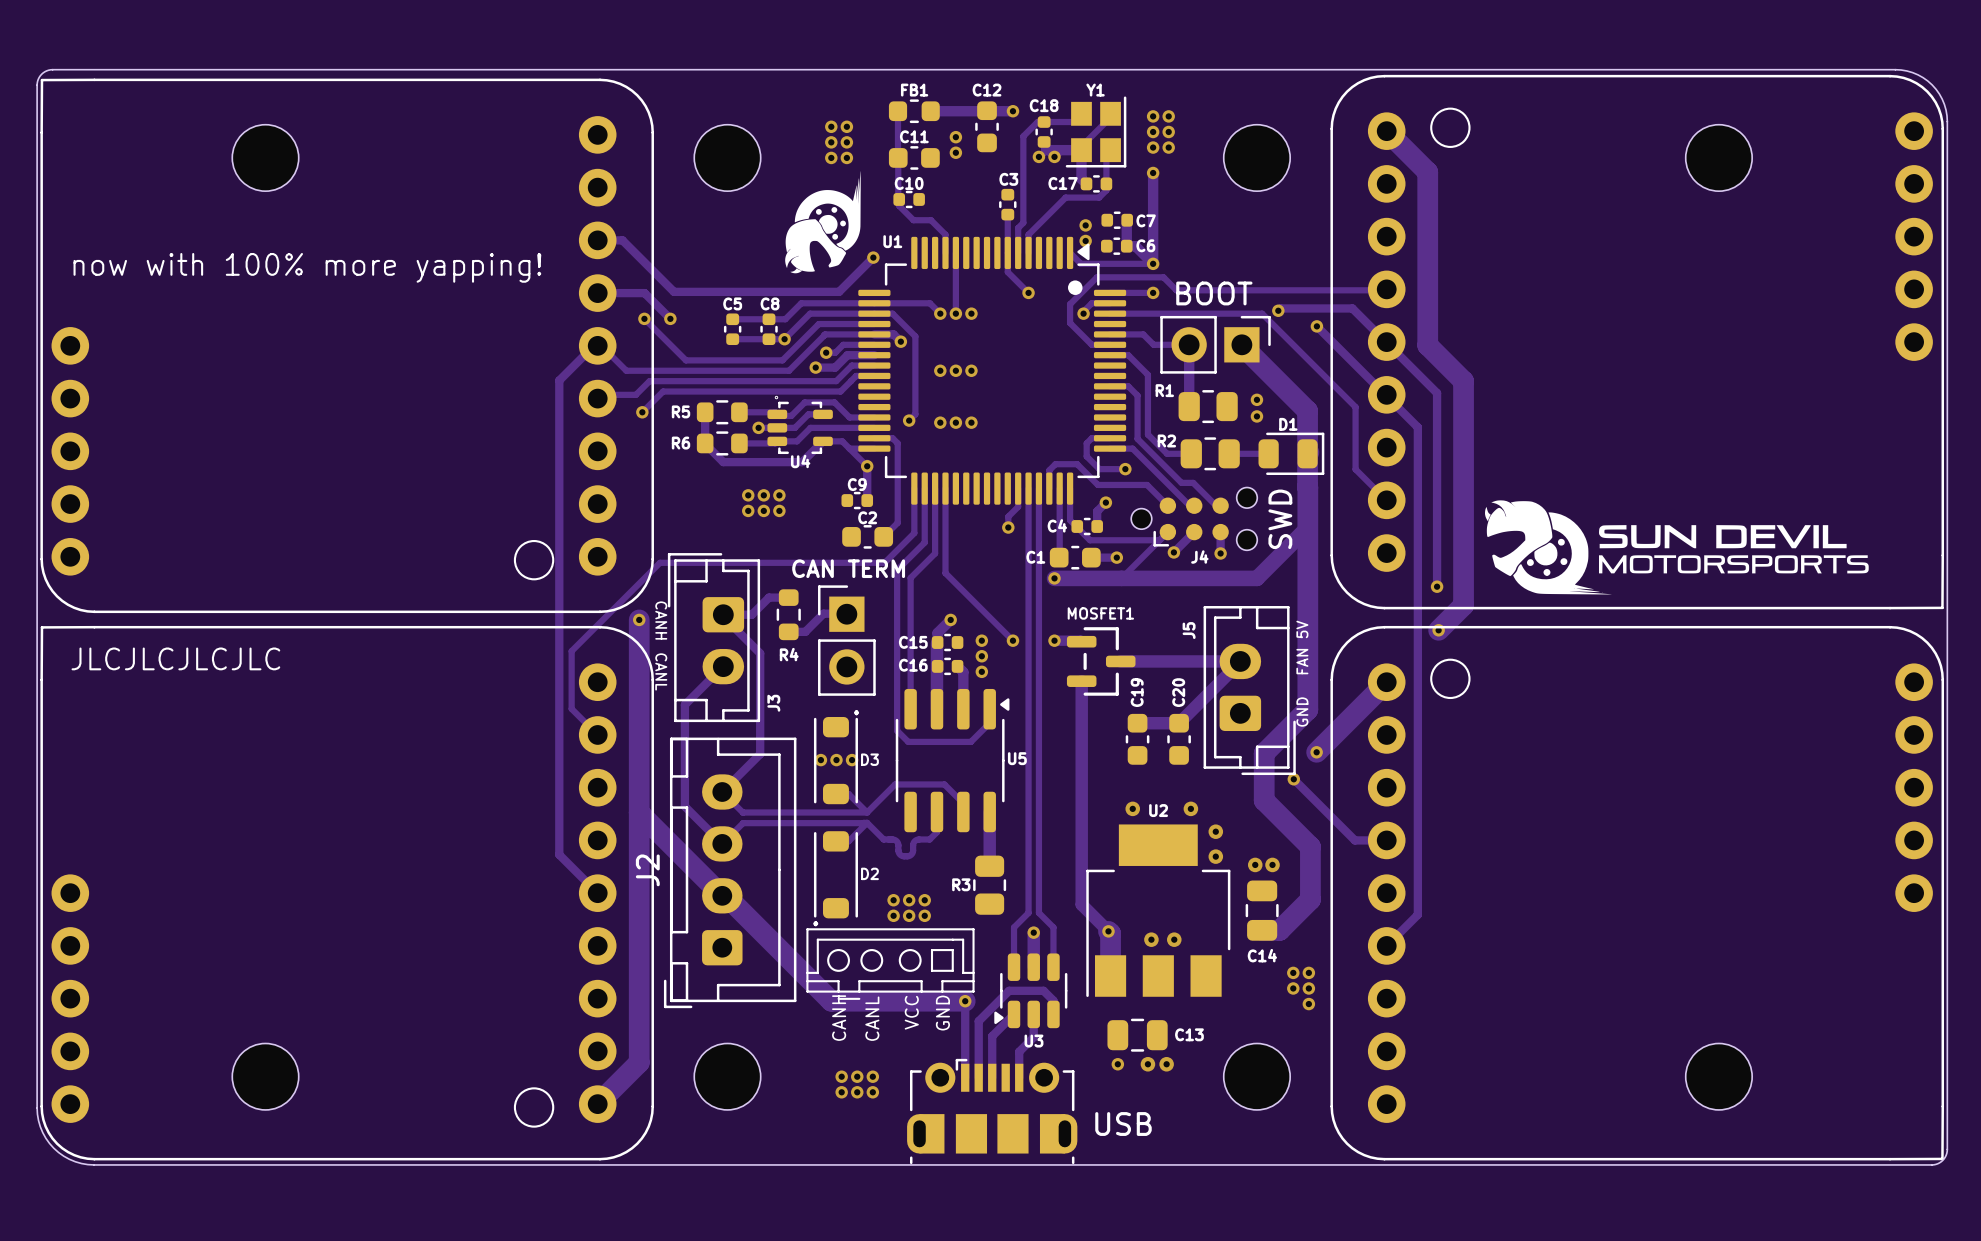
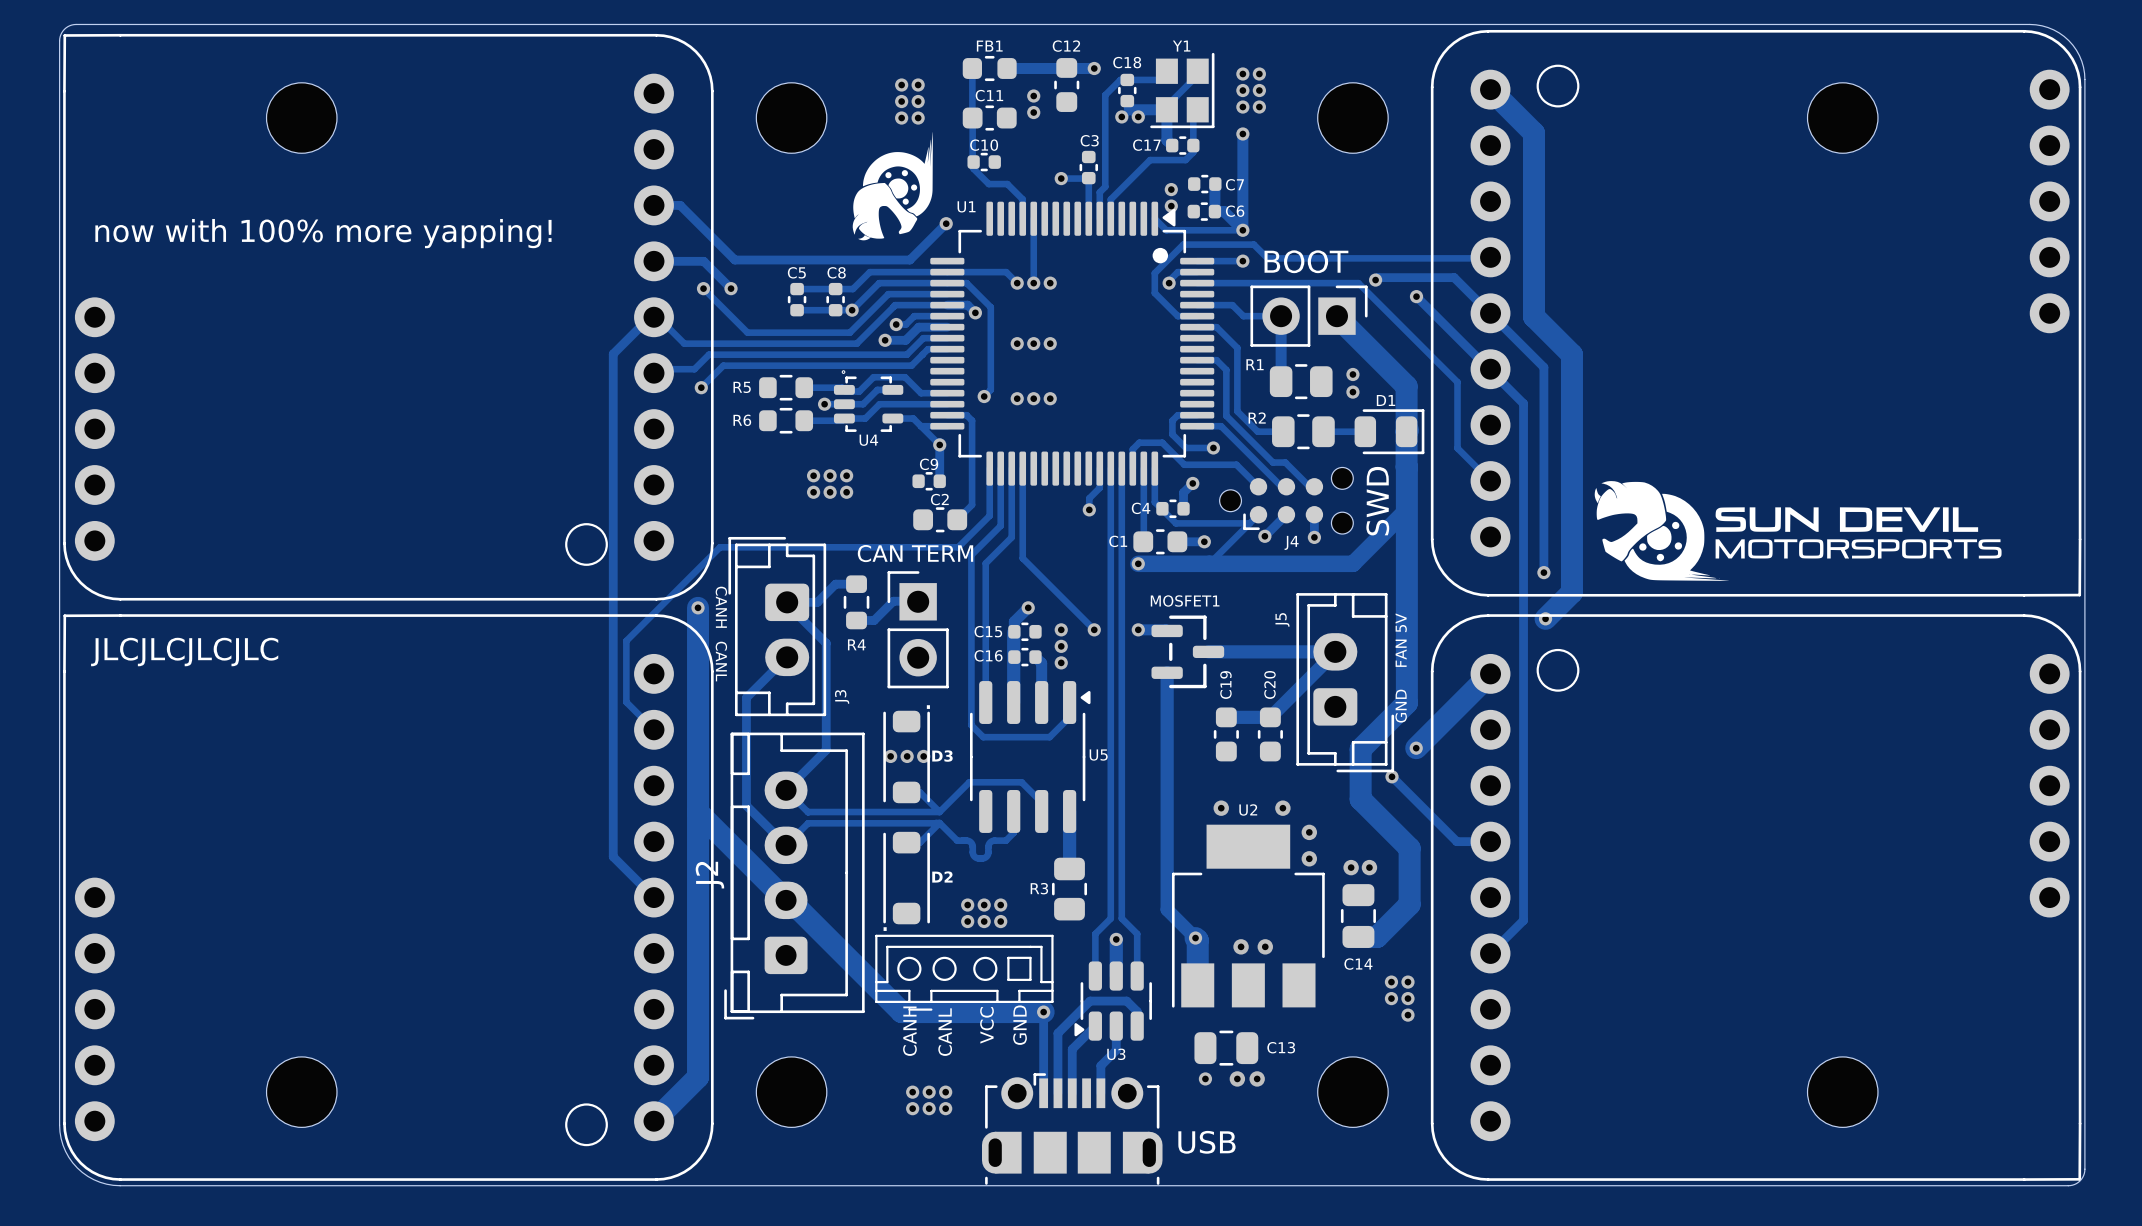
track: none -> (1061, 178) (1088, 178)
track: (1007, 252) (1007, 272) (1028, 292) -> none
via position: (1028, 292) -> (1061, 178)
track: (705, 412) (705, 443) (723, 462) (802, 462) (822, 441) -> none

